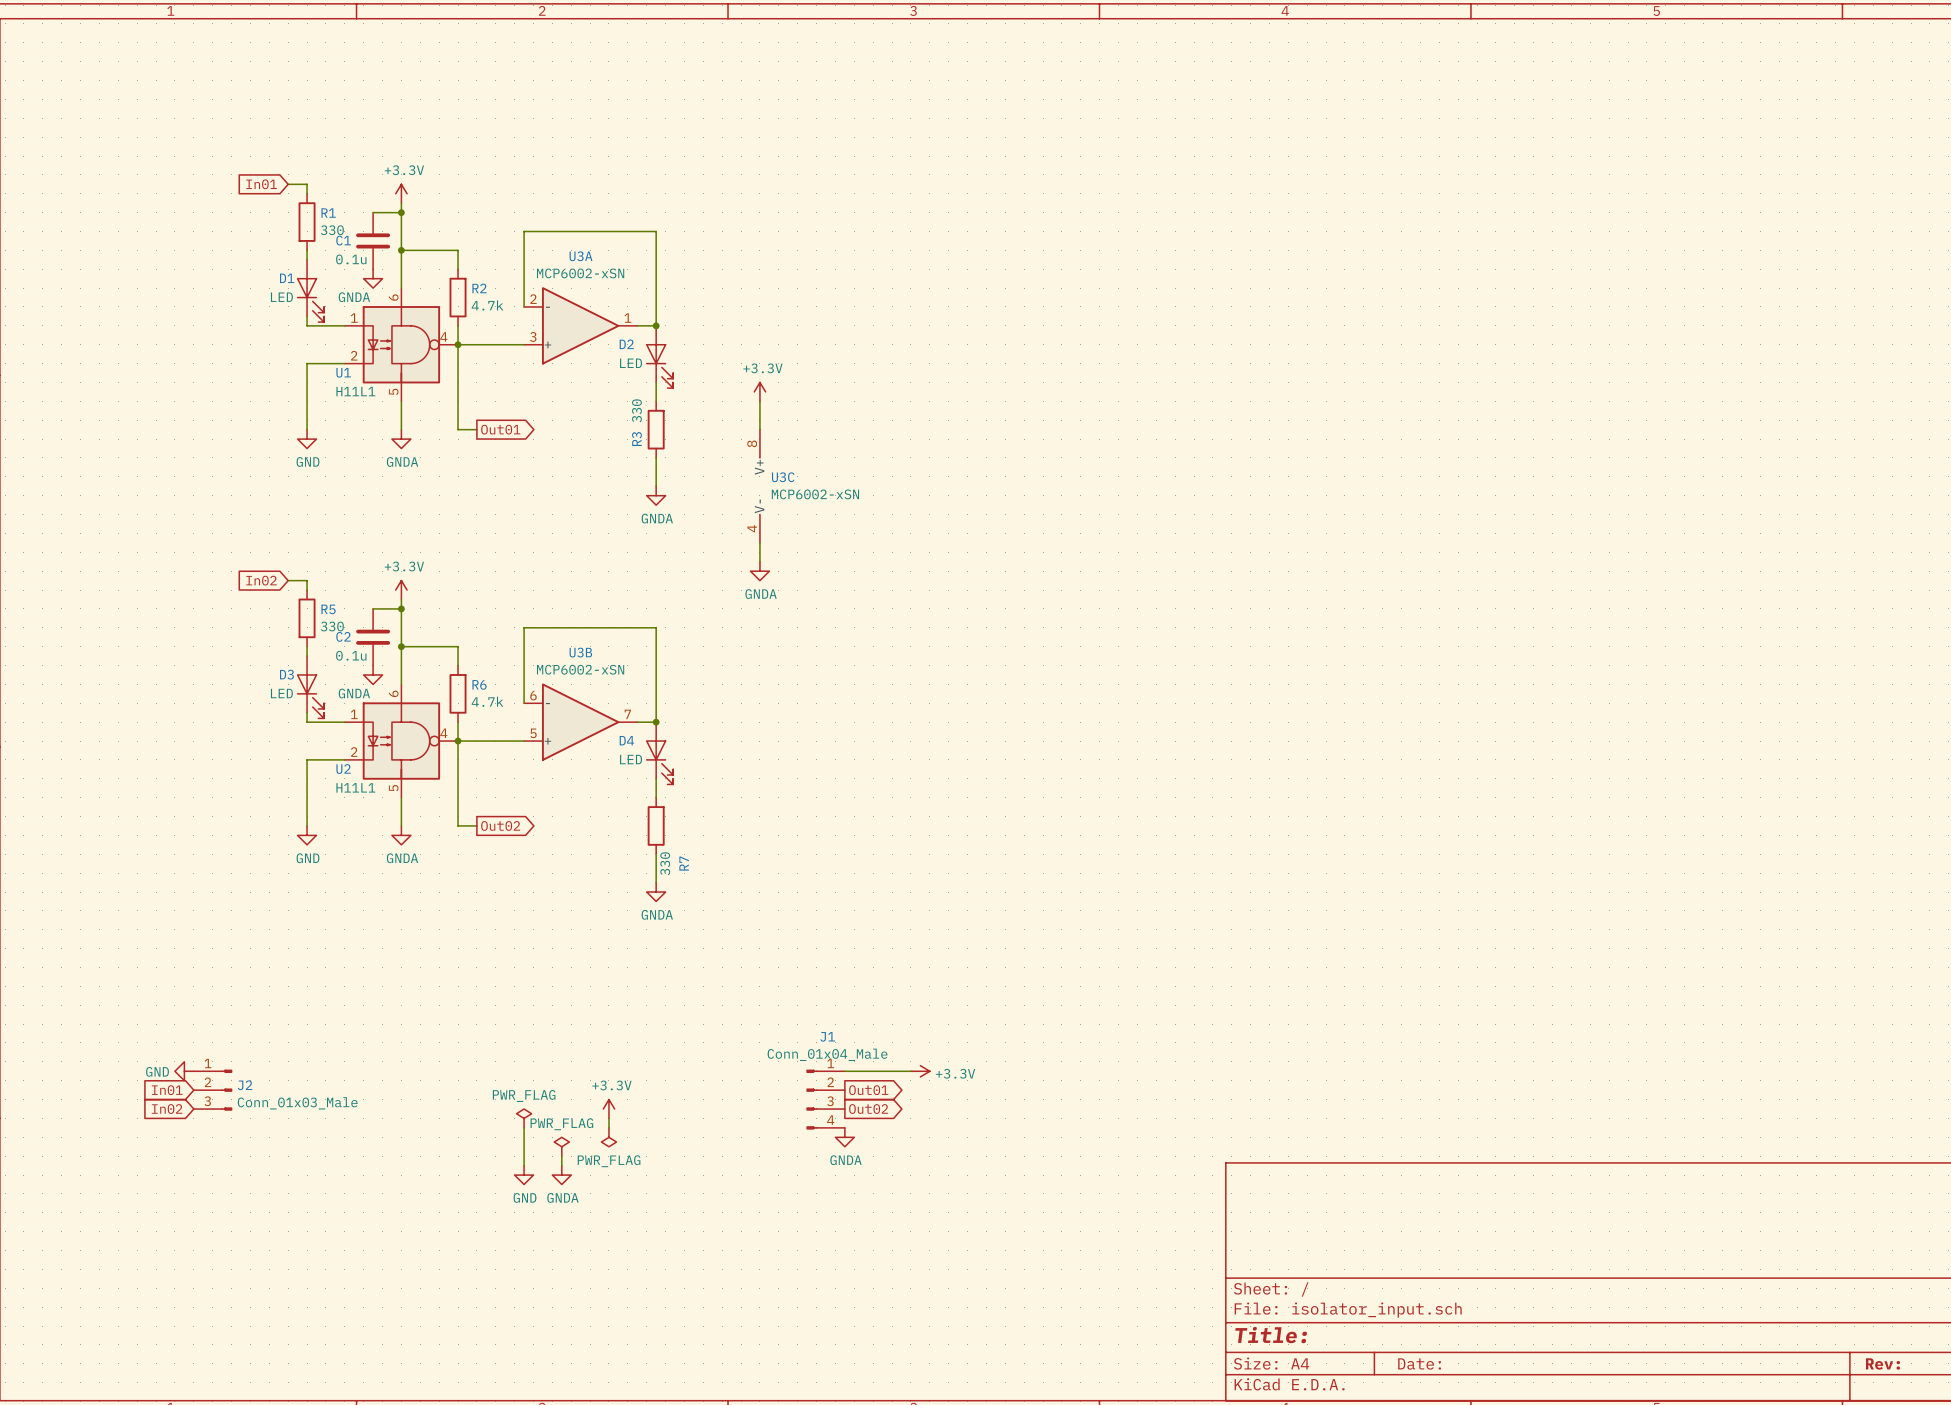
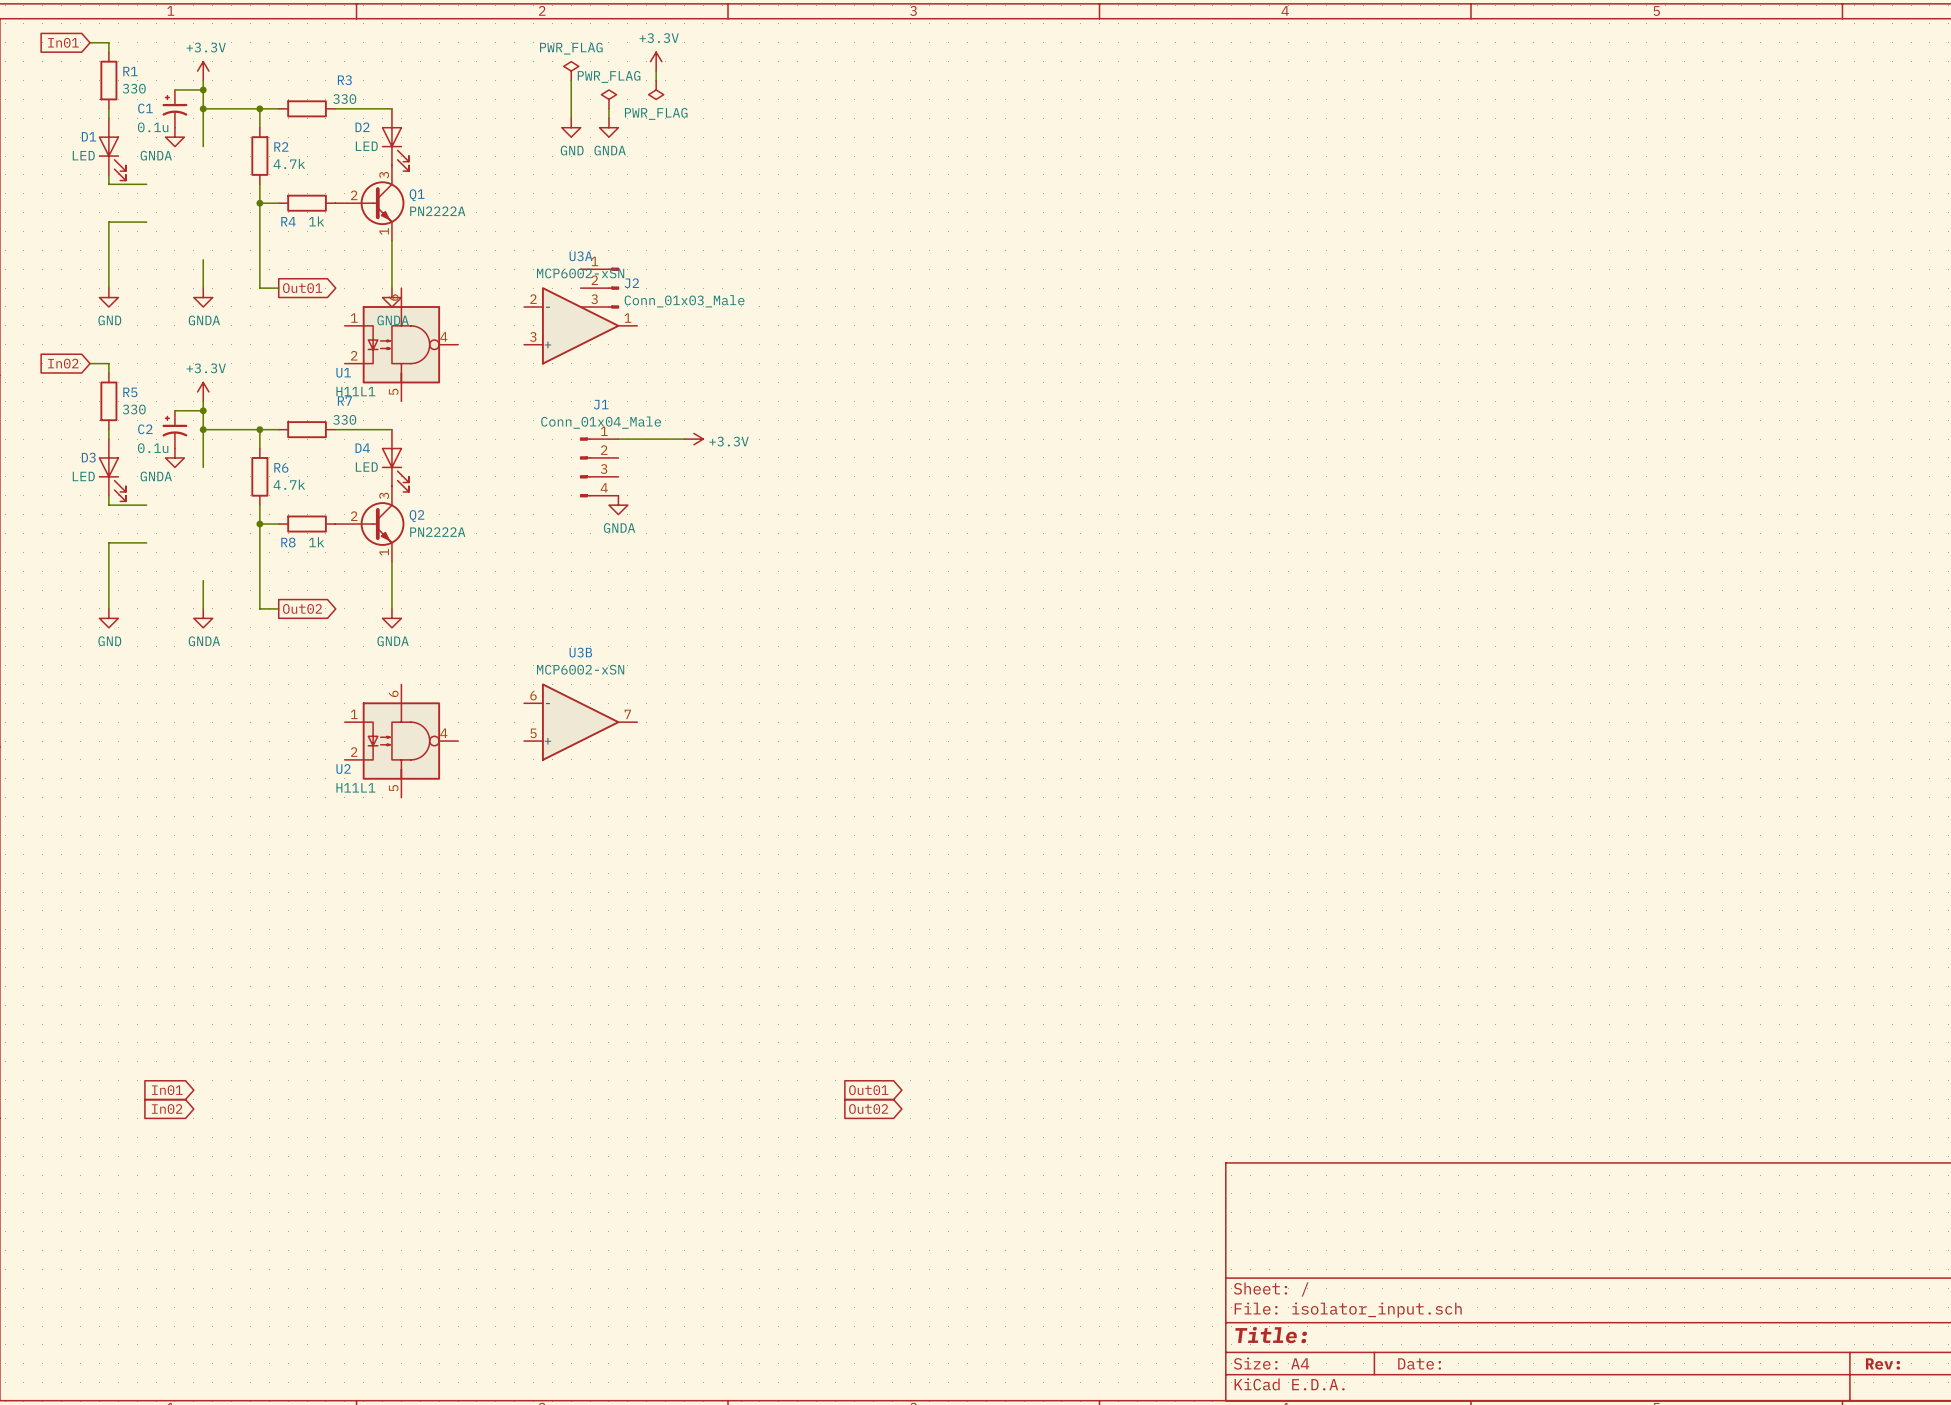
global label: none -> In01 (63, 42)
wire: none -> (90, 42) (108, 42) (108, 52)
power symbol: none -> +3.3V (656, 61)
power symbol: none -> +3.3V (203, 71)
power symbol: none -> PWR_FLAG (571, 71)
wire: none -> (656, 71) (656, 80)
wire: none -> (203, 80) (203, 146)
wire: none -> (571, 80) (571, 118)
wire: none -> (174, 89) (203, 89)
junction: none -> (203, 89)
power symbol: none -> PWR_FLAG (656, 89)
power symbol: none -> PWR_FLAG (608, 99)
wire: none -> (108, 108) (108, 118)
wire: none -> (203, 108) (278, 108)
junction: none -> (203, 108)
wire: none -> (259, 108) (259, 127)
junction: none -> (259, 108)
wire: none -> (335, 108) (391, 108)
wire: none -> (608, 108) (608, 118)
power symbol: none -> GND (571, 127)
power symbol: none -> GNDA (608, 127)
power symbol: none -> GNDA (174, 137)
wire: none -> (108, 174) (108, 184) (146, 184)
wire: none -> (259, 184) (259, 288) (278, 288)
global label: In01 (261, 184) -> none
wire: (288, 184) (307, 184) (307, 193) -> none
power symbol: +3.3V (401, 193) -> none
wire: none -> (259, 203) (278, 203)
junction: none -> (259, 203)
R4: none -> 1k (307, 203)
Q1: none -> PN2222A (369, 203)
wire: (401, 203) (401, 288) -> none
C1 symbol: [356, 212, 391, 270] -> [162, 89, 188, 128]
wire: (373, 212) (401, 212) -> none
junction: (401, 212) -> none
wire: none -> (146, 222) (108, 222) (108, 288)
R1 position: (307, 222) -> (108, 80)
wire: none -> (391, 240) (391, 288)
wire: (307, 250) (307, 259) -> none
wire: (401, 250) (458, 250) (458, 269) -> none
junction: (401, 250) -> none
wire: none -> (203, 259) (203, 288)
power symbol position: GNDA (373, 278) -> GNDA (391, 297)
global label: none -> Out01 (302, 288)
D1 position: (310, 290) -> (112, 149)
power symbol: none -> GND (108, 297)
power symbol: none -> GNDA (203, 297)
power symbol text position: GNDA (354, 297) -> GNDA (393, 320)
R2 position: (458, 297) -> (259, 156)
wire: (524, 306) (524, 231) (656, 231) (656, 325) (637, 325) -> none
wire: (307, 316) (307, 325) (344, 325) -> none
wire: (458, 325) (458, 429) (476, 429) -> none
junction: (656, 325) -> none
wire: (458, 344) (524, 344) -> none
junction: (458, 344) -> none
D2 position: (659, 357) -> (395, 139)
global label: none -> In02 (63, 363)
wire: none -> (90, 363) (108, 363) (108, 373)
wire: (344, 363) (307, 363) (307, 429) -> none
power symbol text position: +3.3V (762, 368) -> +3.3V (729, 441)
wire: (656, 382) (656, 401) -> none
power symbol: none -> +3.3V (203, 391)
power symbol rotation: 0° (759, 391) -> 90° clockwise (693, 439)
power symbol position: +3.3V (759, 391) -> +3.3V (693, 439)
wire: none -> (203, 401) (203, 467)
wire: (401, 401) (401, 429) -> none
wire: (759, 401) (759, 429) -> none
wire: none -> (174, 410) (203, 410)
junction: none -> (203, 410)
R3 value position: 330 (636, 410) -> 330 (344, 99)
wire: none -> (108, 429) (108, 439)
wire: none -> (203, 429) (278, 429)
junction: none -> (203, 429)
wire: none -> (259, 429) (259, 448)
junction: none -> (259, 429)
wire: none -> (335, 429) (391, 429)
global label: Out01 (500, 429) -> none
R3 rotation: 0° (656, 429) -> 90° clockwise (307, 108)
R3 position: (656, 429) -> (307, 108)
power symbol: GND (307, 439) -> none
power symbol: GNDA (401, 439) -> none
wire: none -> (618, 439) (684, 439)
R3 name position: R3 (636, 439) -> R3 (344, 80)
power symbol: none -> GNDA (174, 457)
wire: (656, 457) (656, 486) -> none
U3C: MCP6002-xSN (759, 486) -> none
wire: none -> (108, 495) (108, 505) (146, 505)
power symbol position: GNDA (656, 495) -> GNDA (618, 505)
wire: none -> (259, 505) (259, 608) (278, 608)
wire: none -> (259, 524) (278, 524)
junction: none -> (259, 524)
R8: none -> 1k (307, 524)
Q2: none -> PN2222A (369, 524)
wire: none -> (146, 542) (108, 542) (108, 608)
wire: (759, 542) (759, 561) -> none
wire: none -> (391, 561) (391, 608)
power symbol: GNDA (759, 571) -> none
wire: none -> (203, 580) (203, 608)
global label: In02 (261, 580) -> none
wire: (288, 580) (307, 580) (307, 590) -> none
power symbol: +3.3V (401, 590) -> none
wire: (401, 599) (401, 684) -> none
global label: none -> Out02 (302, 608)
C2 symbol: [356, 608, 391, 666] -> [162, 410, 188, 449]
wire: (373, 608) (401, 608) -> none
junction: (401, 608) -> none
power symbol: none -> GND (108, 618)
power symbol: none -> GNDA (203, 618)
R5 position: (307, 618) -> (108, 401)
wire: (307, 646) (307, 656) -> none
wire: (401, 646) (458, 646) (458, 665) -> none
junction: (401, 646) -> none
power symbol position: GNDA (373, 674) -> GNDA (391, 618)
D3 position: (310, 687) -> (112, 470)
power symbol text position: GNDA (354, 693) -> GNDA (393, 641)
R6 position: (458, 693) -> (259, 476)
wire: (524, 703) (524, 627) (656, 627) (656, 722) (637, 722) -> none
wire: (307, 712) (307, 722) (344, 722) -> none
wire: (458, 722) (458, 825) (476, 825) -> none
junction: (656, 722) -> none
wire: (458, 741) (524, 741) -> none
junction: (458, 741) -> none
D4 position: (659, 753) -> (395, 460)
wire: (344, 759) (307, 759) (307, 825) -> none
wire: (656, 778) (656, 797) -> none
wire: (401, 797) (401, 825) -> none
global label: Out02 (500, 825) -> none
R7 rotation: 0° (656, 825) -> 90° clockwise (307, 429)
R7 position: (656, 825) -> (307, 429)
power symbol: GND (307, 835) -> none
power symbol: GNDA (401, 835) -> none
wire: (656, 854) (656, 882) -> none
R7 value position: 330 (665, 863) -> 330 (344, 419)
R7 name position: R7 (684, 863) -> R7 (344, 401)
power symbol: GNDA (656, 892) -> none
power symbol: GND (184, 1071) -> none
wire: (844, 1071) (910, 1071) -> none
power symbol: +3.3V (920, 1071) -> none
J2 position: (212, 1090) -> (599, 288)
J1 position: (825, 1099) -> (599, 467)
power symbol: +3.3V (608, 1109) -> none
power symbol: PWR_FLAG (524, 1118) -> none
wire: (608, 1118) (608, 1127) -> none
wire: (524, 1127) (524, 1165) -> none
power symbol: PWR_FLAG (608, 1137) -> none
power symbol: GNDA (844, 1137) -> none
power symbol: PWR_FLAG (561, 1146) -> none
wire: (561, 1156) (561, 1165) -> none
power symbol: GND (524, 1175) -> none
power symbol: GNDA (561, 1175) -> none

